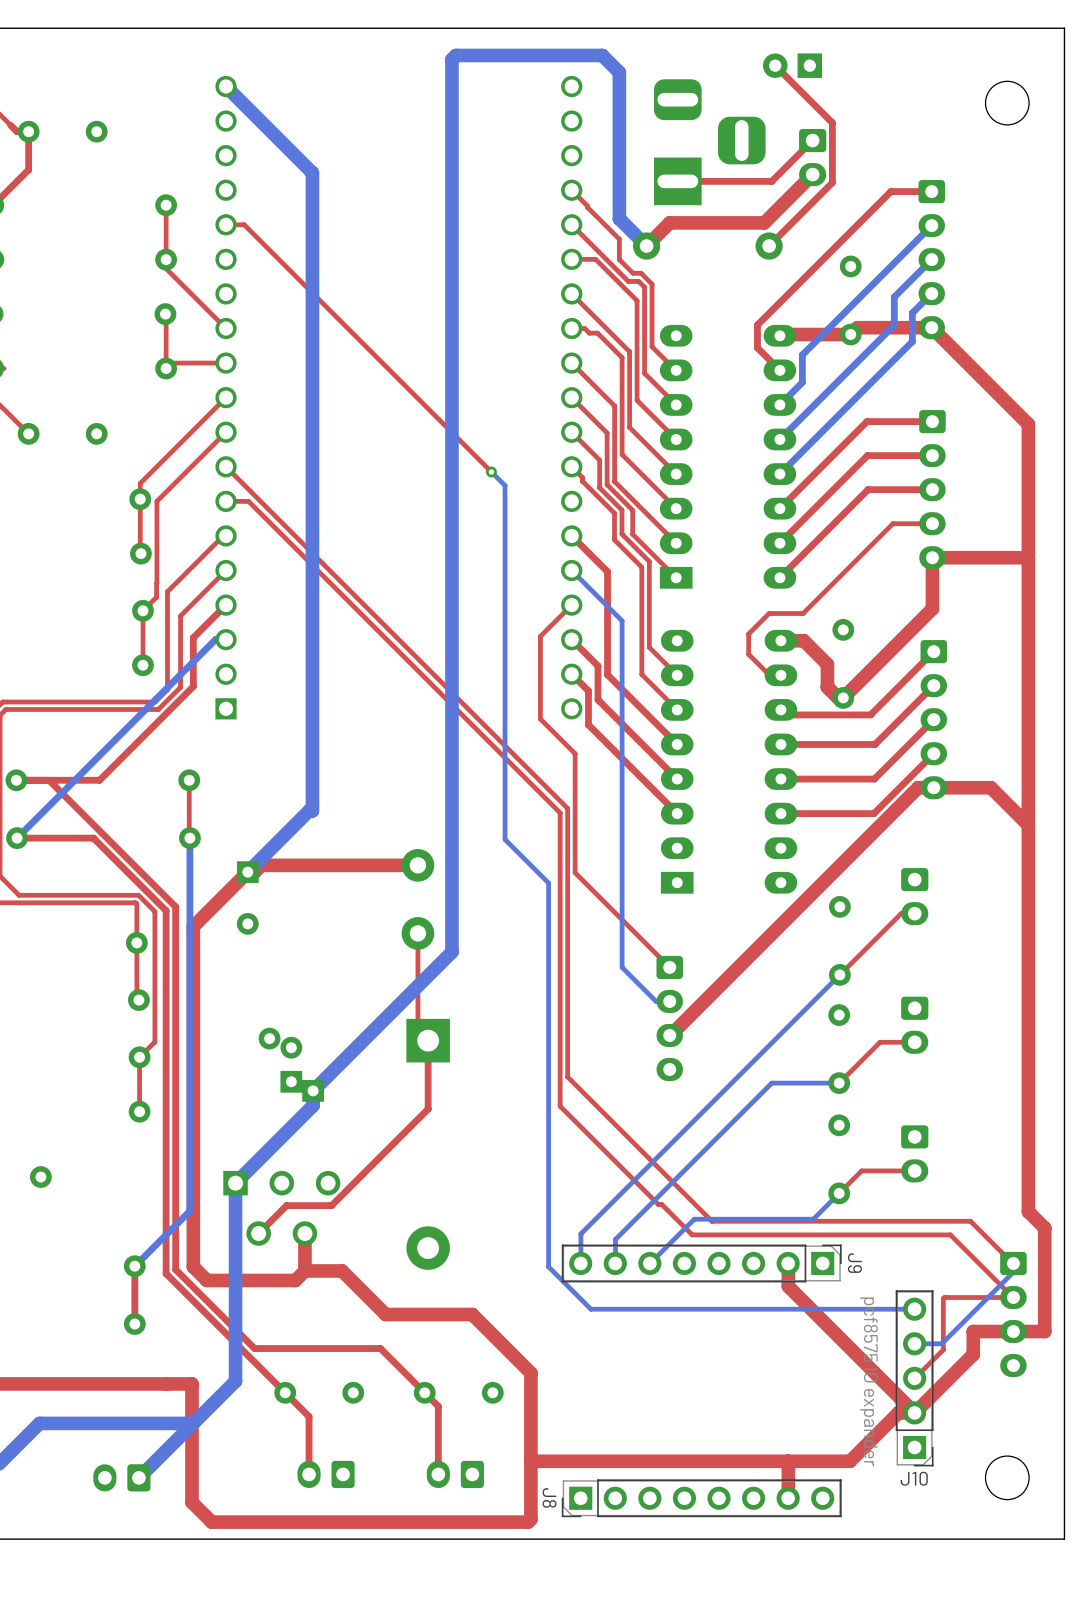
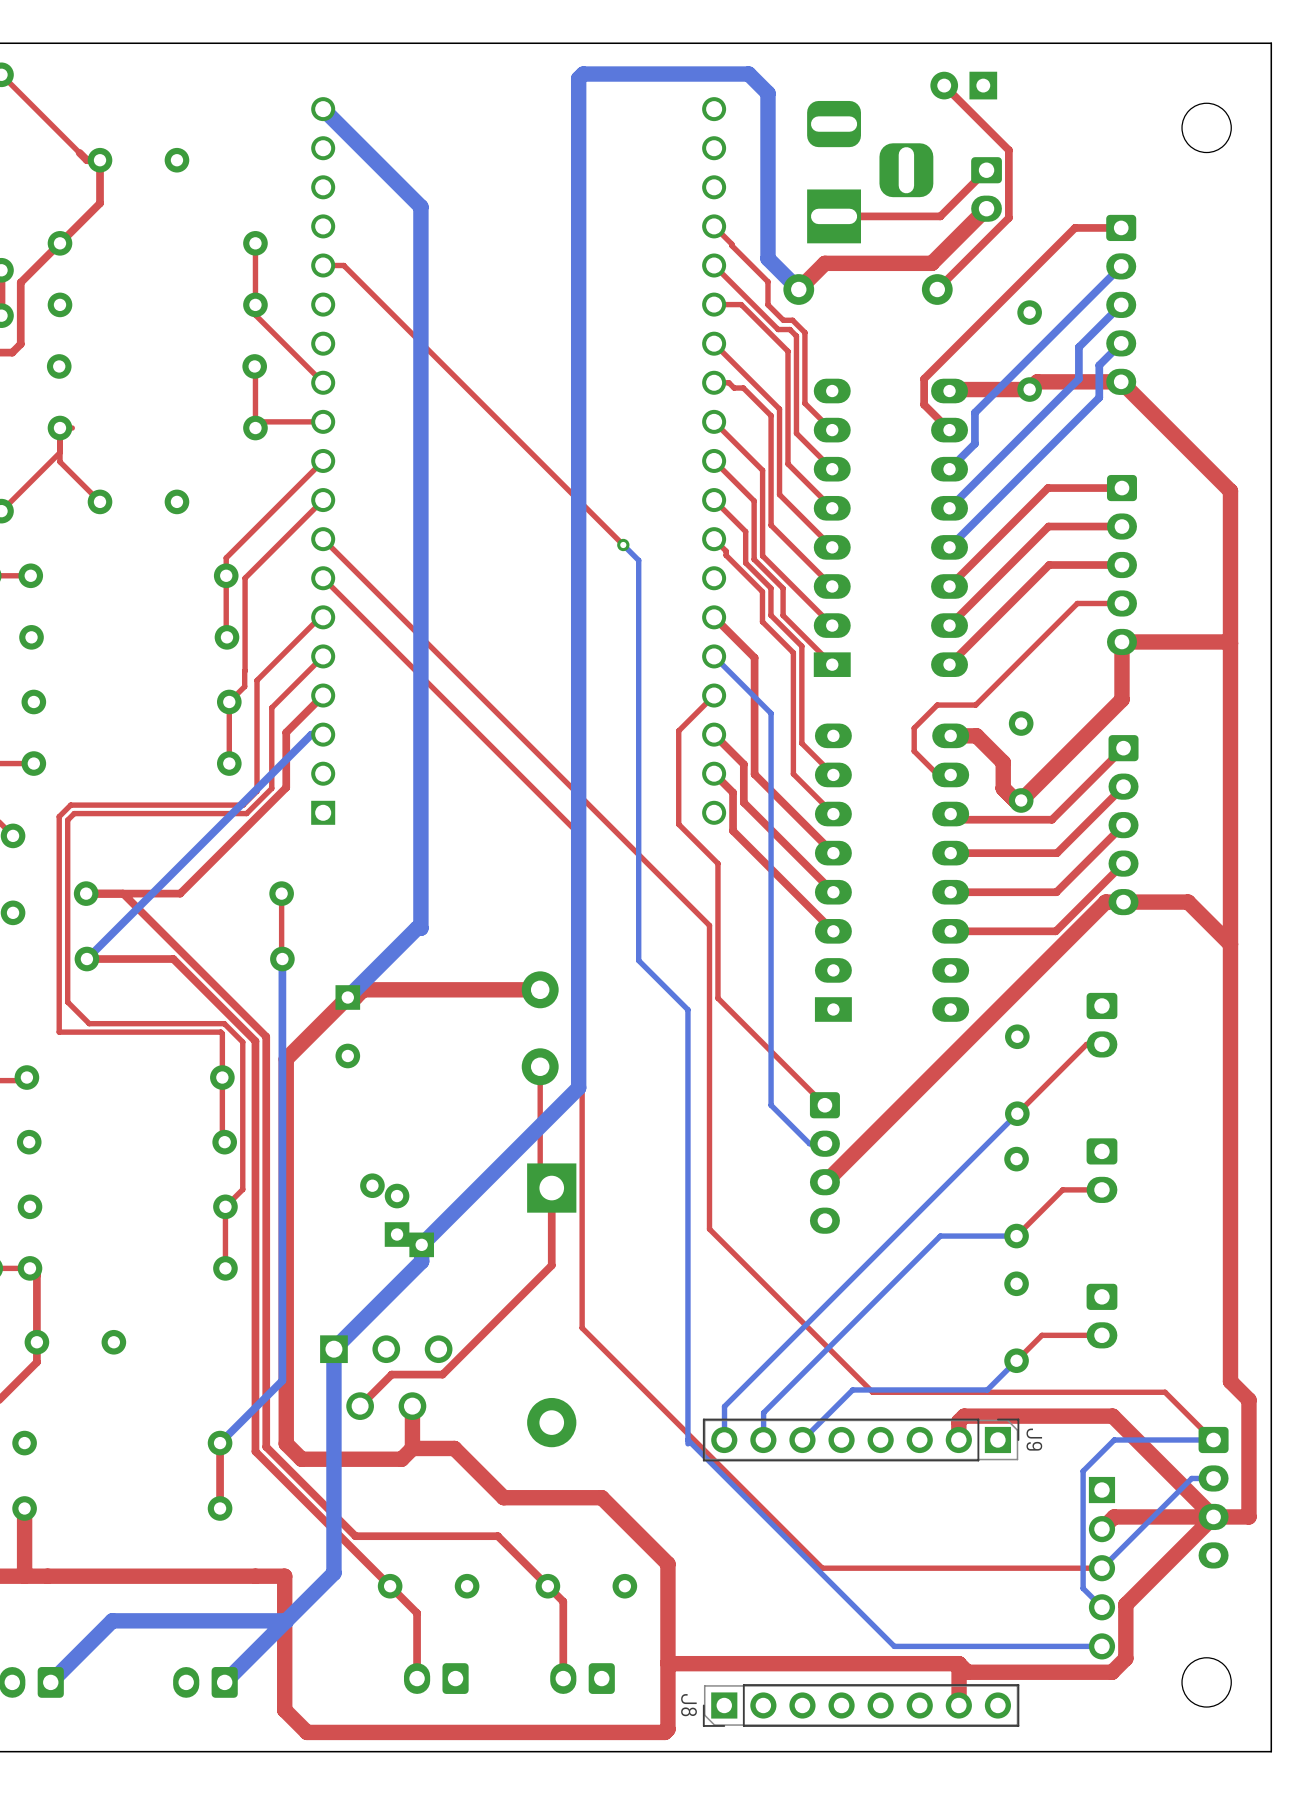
top track: (226, 501) (248, 501) (560, 812) (560, 1106) (658, 1204) (661, 1204) (692, 1234) (950, 1234) (1013, 1297) -> (323, 578) (582, 837) (582, 1328) (822, 1568) (1101, 1568)
bottom track: none -> (687, 1440) (894, 1646) (1101, 1646)
top track: (788, 1263) (788, 1286) (914, 1412) -> (958, 1440) (958, 1421) (964, 1416) (1112, 1416) (1213, 1516) (1125, 1604) (1125, 1658) (1112, 1672) (967, 1672) (959, 1663)
bottom track: none -> (1213, 1440) (1114, 1440) (1083, 1471) (1083, 1588) (1101, 1607)
bottom track: (548, 1266) (590, 1309) (914, 1309) -> none
bottom track: (1013, 1272) (941, 1343) (914, 1343) -> none
top track: (1013, 1297) (944, 1297) (943, 1349) (914, 1378) -> none
bottom track: none -> (1213, 1478) (1191, 1478) (1101, 1568)
top track: (973, 1331) (973, 1354) (914, 1412) -> (1168, 1516) (1114, 1516) (1101, 1529)
J10 side: bottom (914, 1378) -> top (1101, 1568)
top track: (914, 1412) (898, 1412) (850, 1461) (788, 1461) -> none

